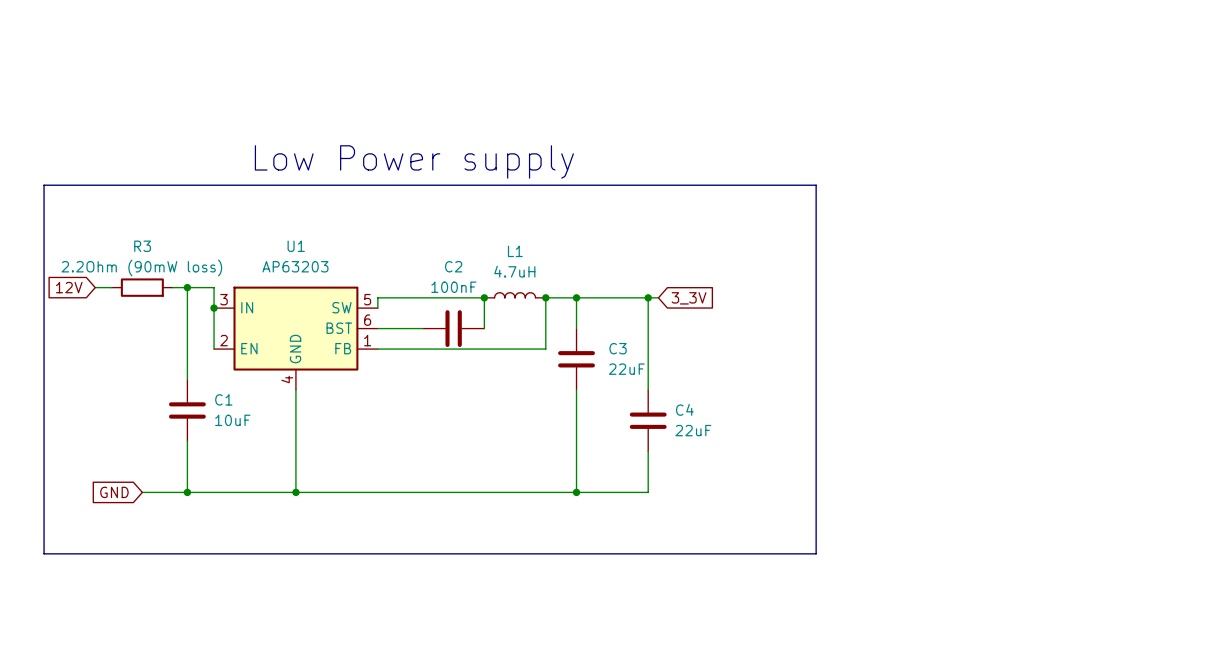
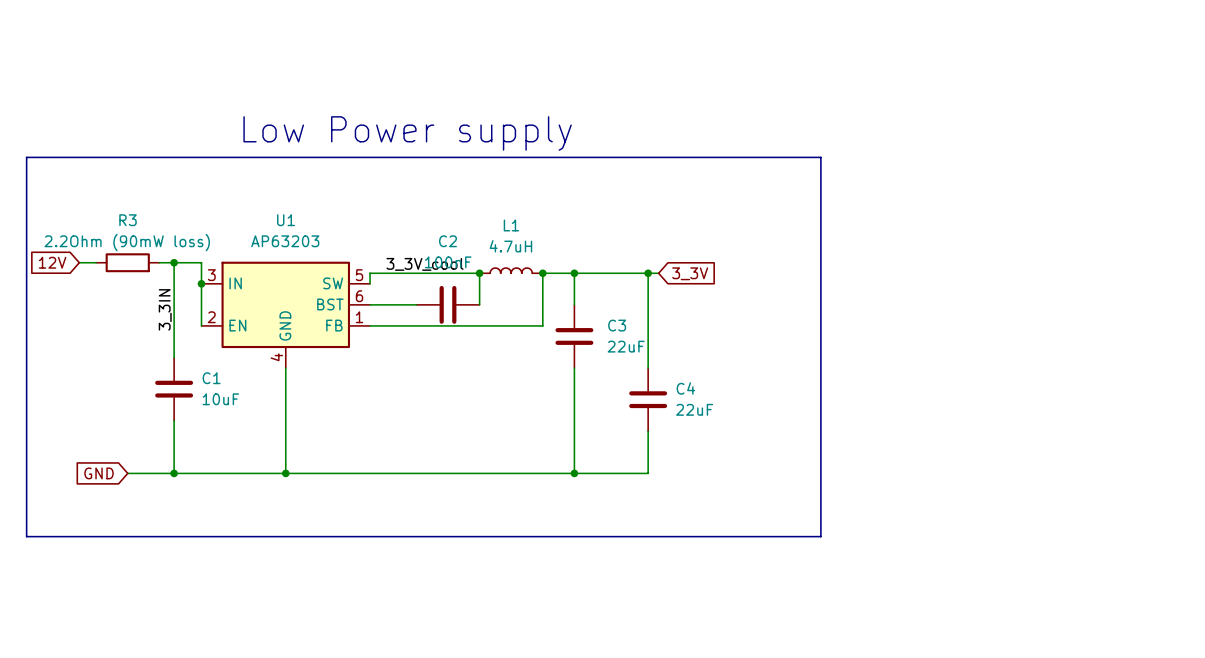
label: none -> 3_3V_cool (425, 264)
label: none -> 3_3IN (165, 309)

